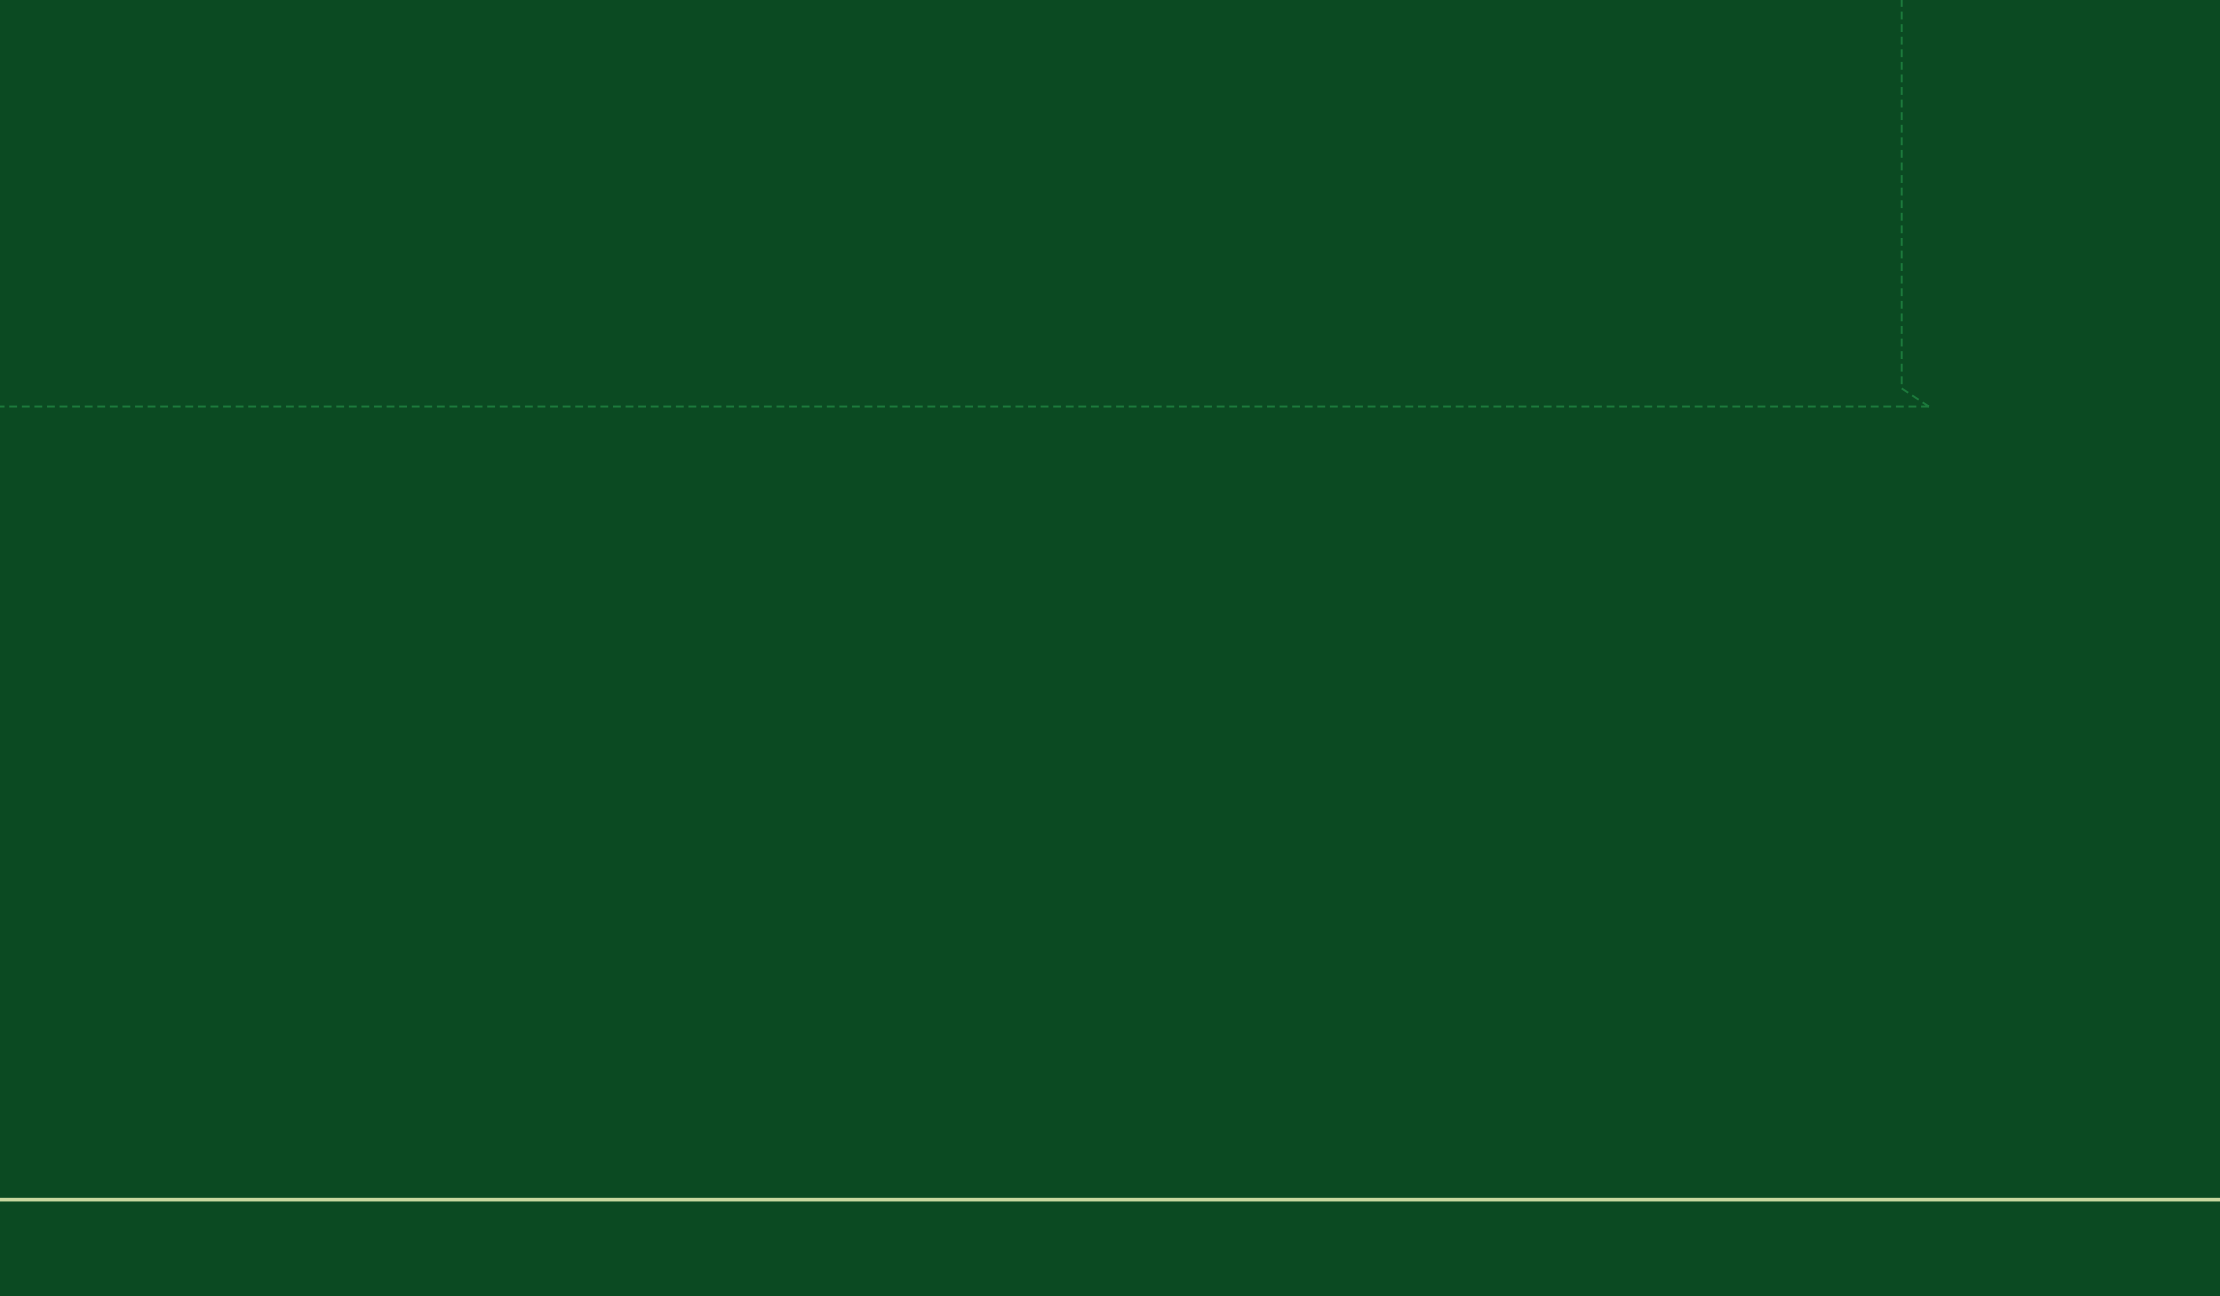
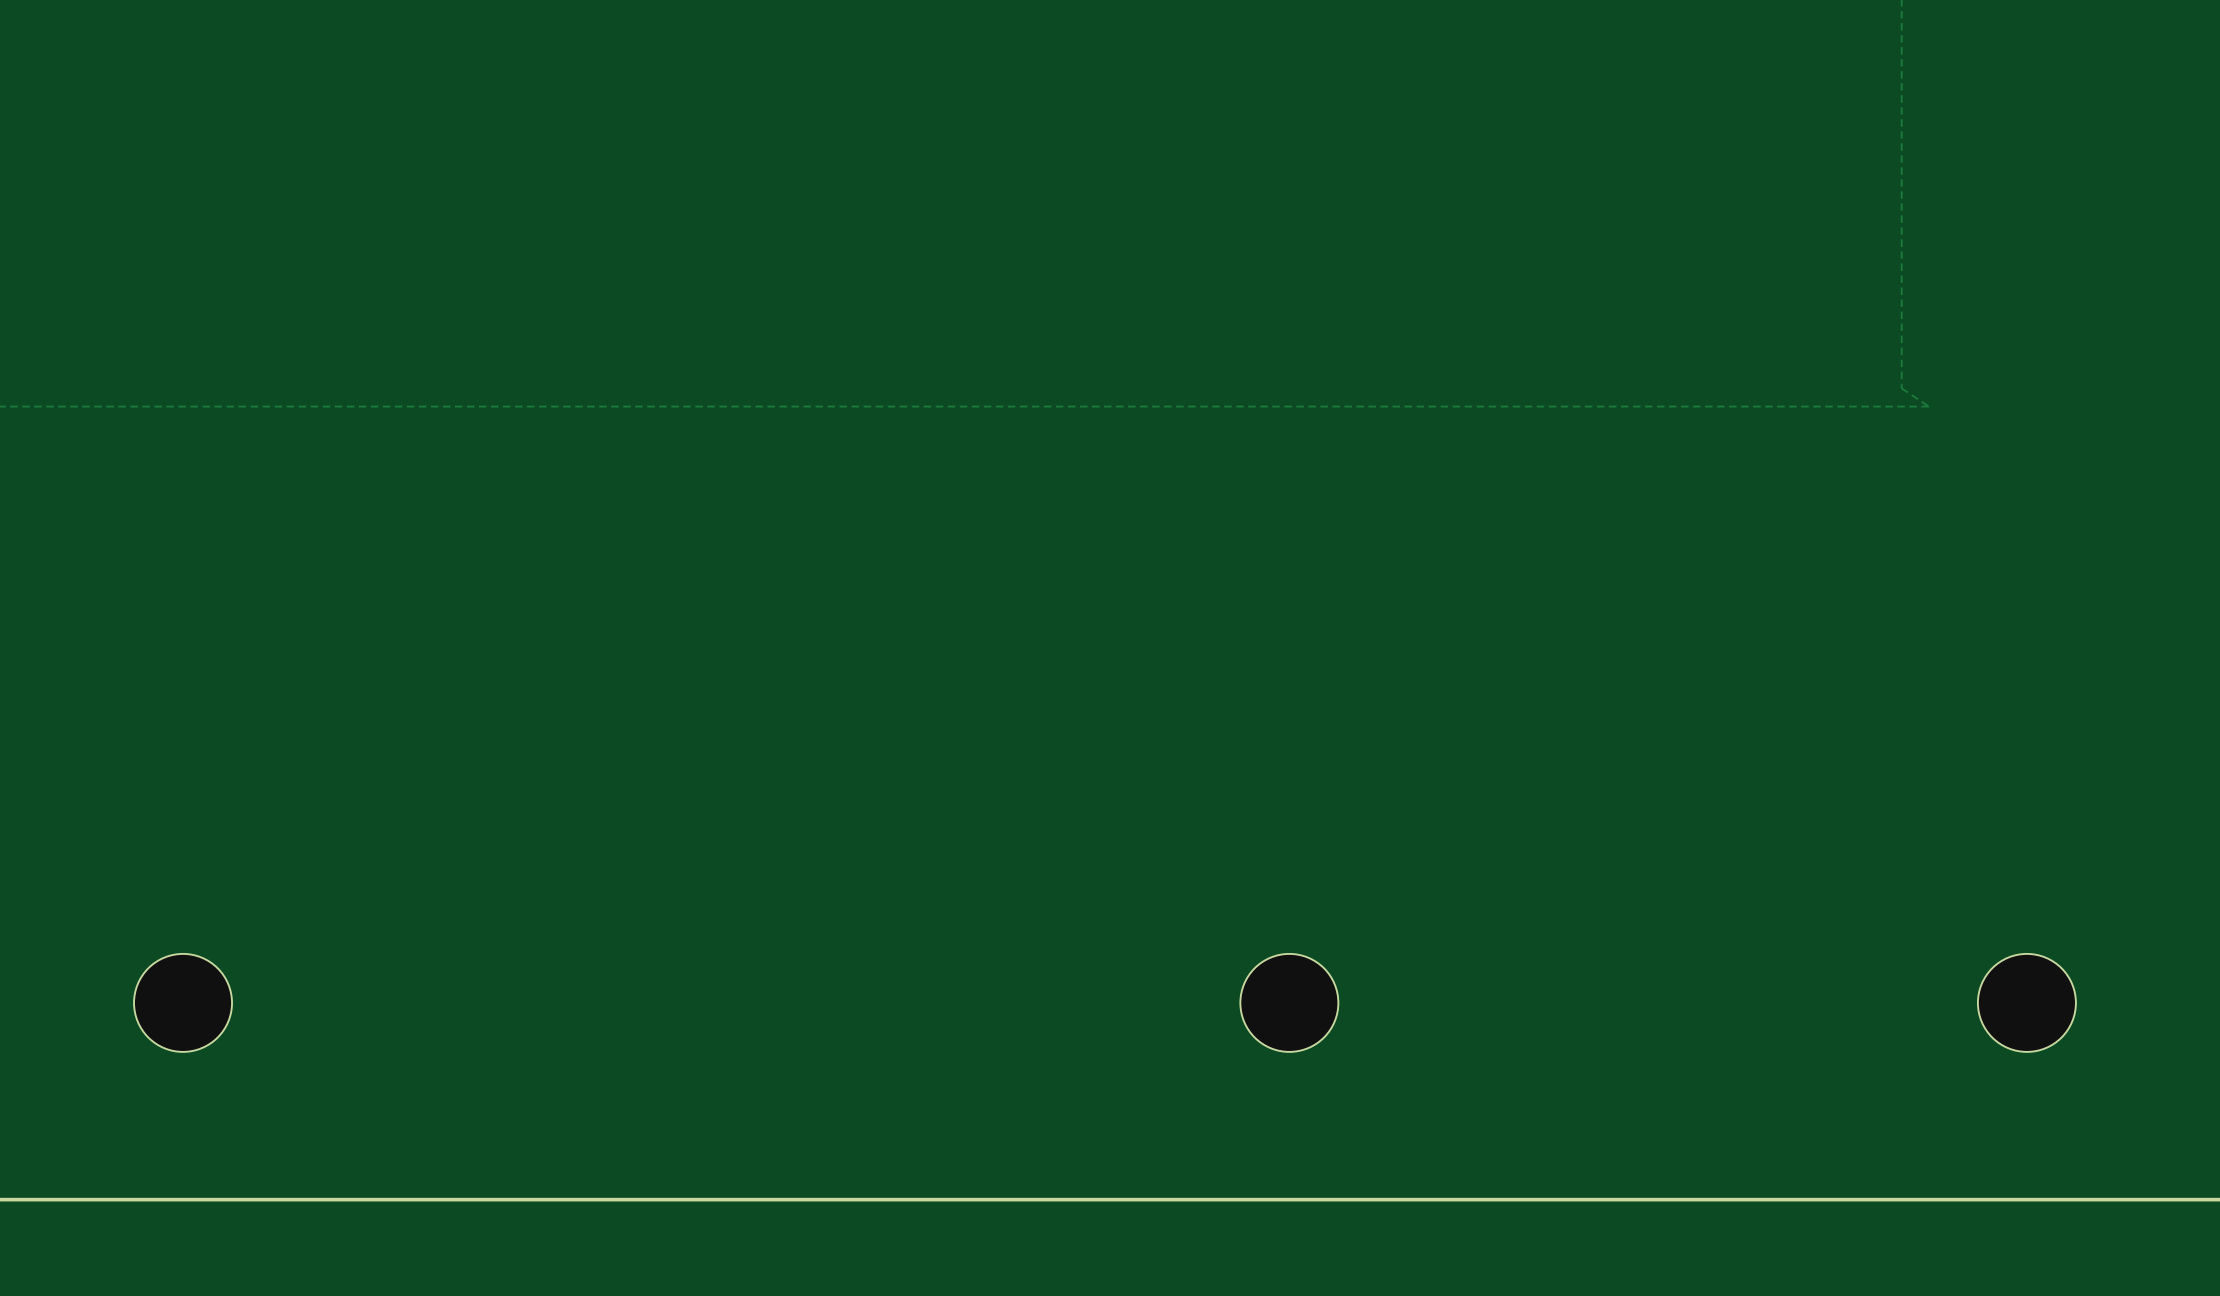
part: none -> (183, 1002)
part: none -> (1289, 1002)
part: none -> (2026, 1002)

